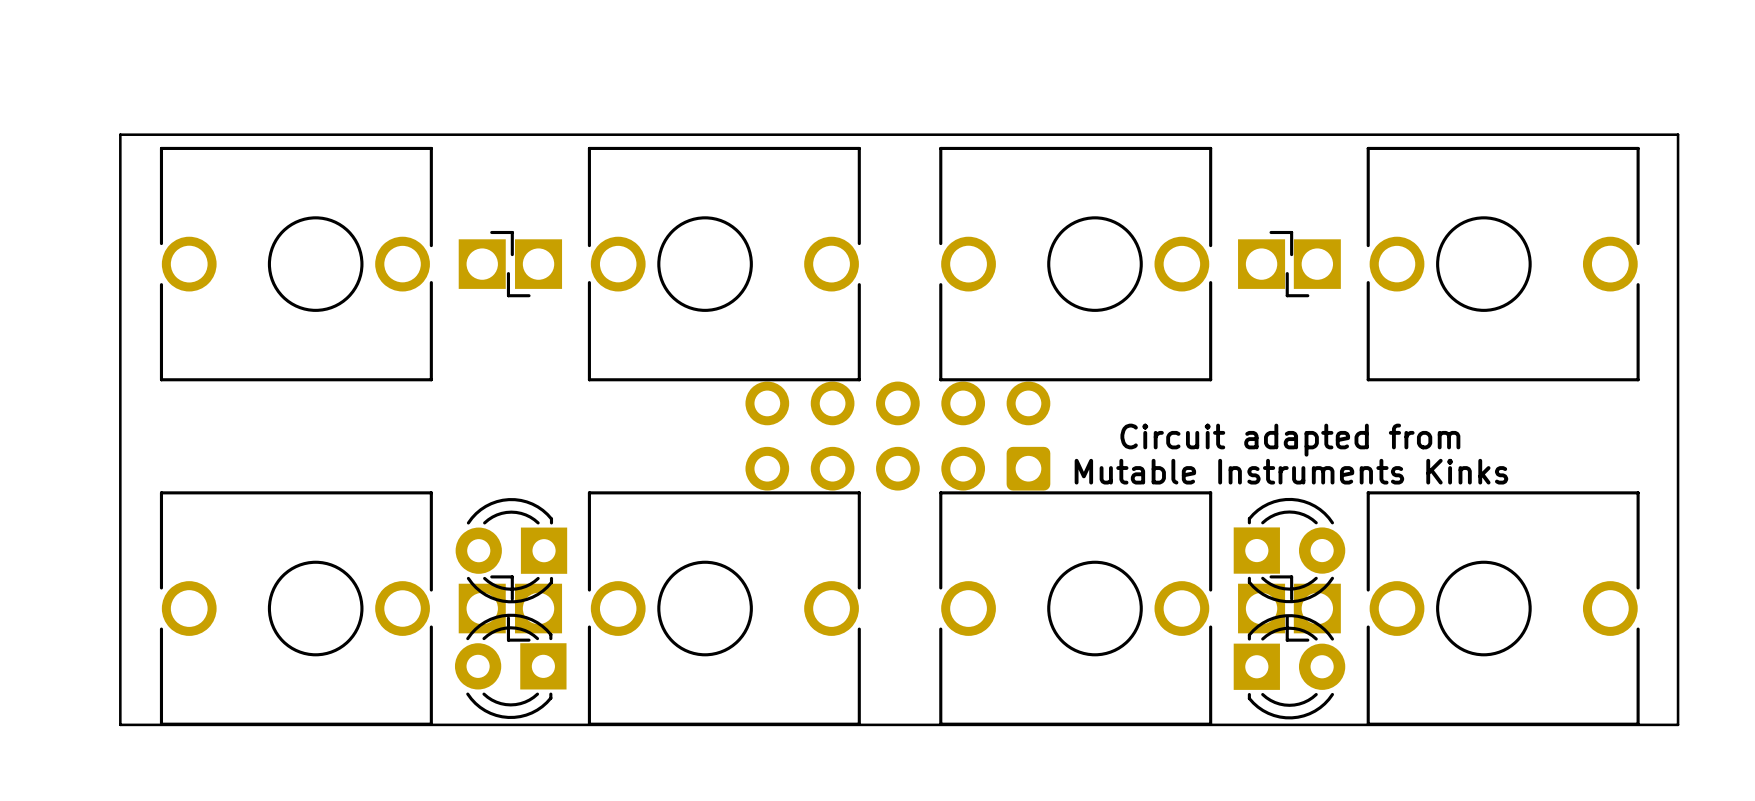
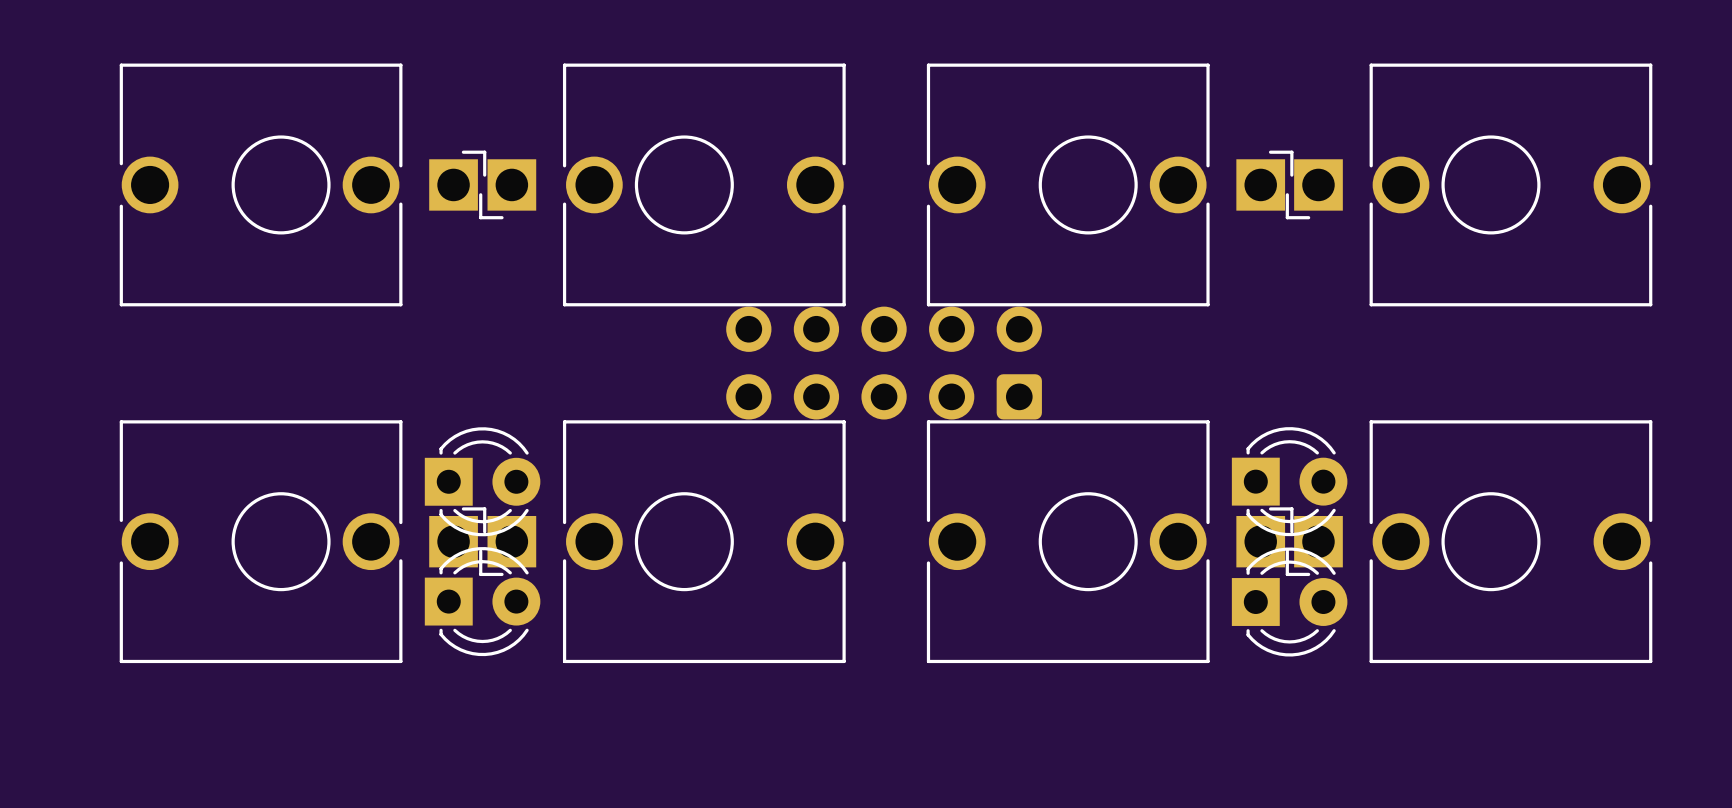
board edge: (120, 134) (1678, 134) (1678, 724) (120, 724) (120, 134) -> none
text: Circuit adapted from (1290, 440) -> none
text: Mutable Instruments Kinks (1291, 471) -> none
part rotation: 0° (511, 550) -> 180° (482, 481)
part rotation: 0° (510, 666) -> 180° (482, 601)

